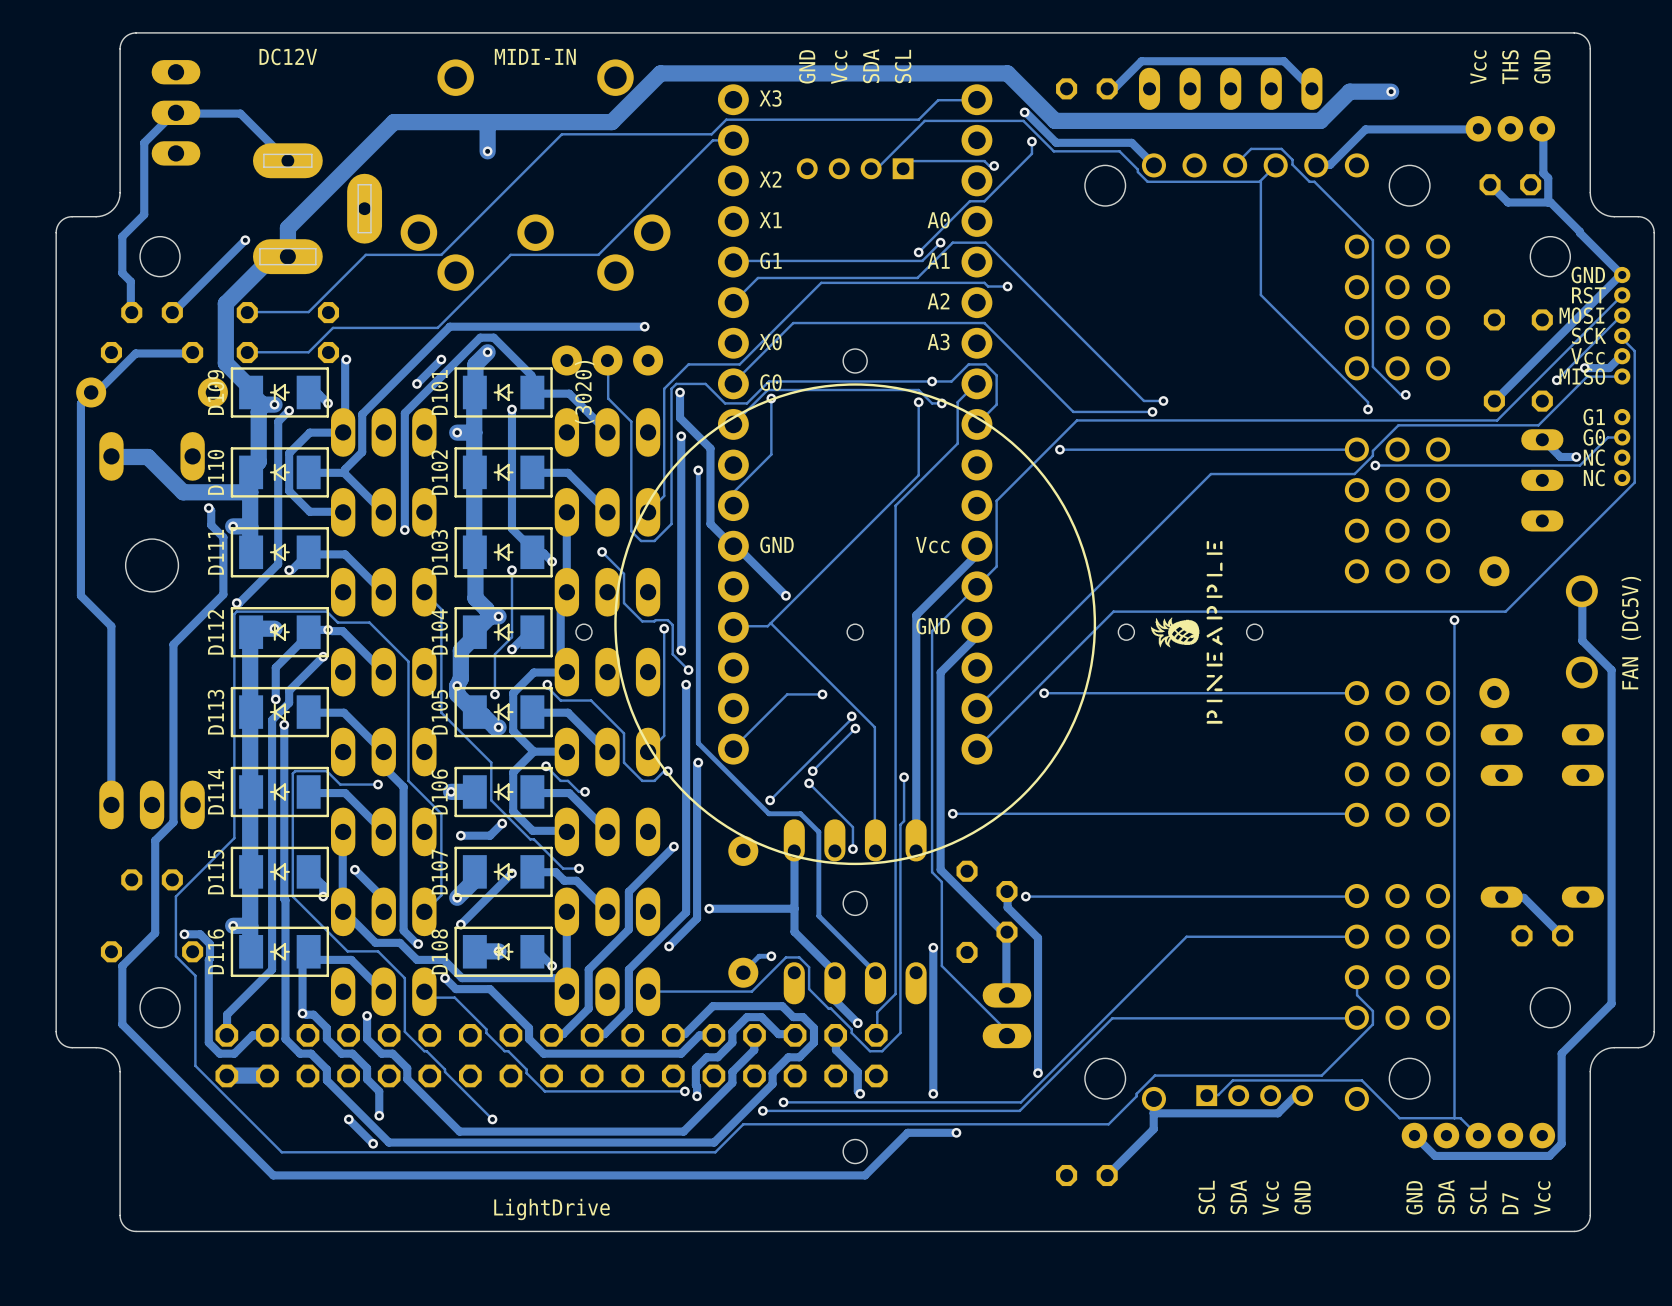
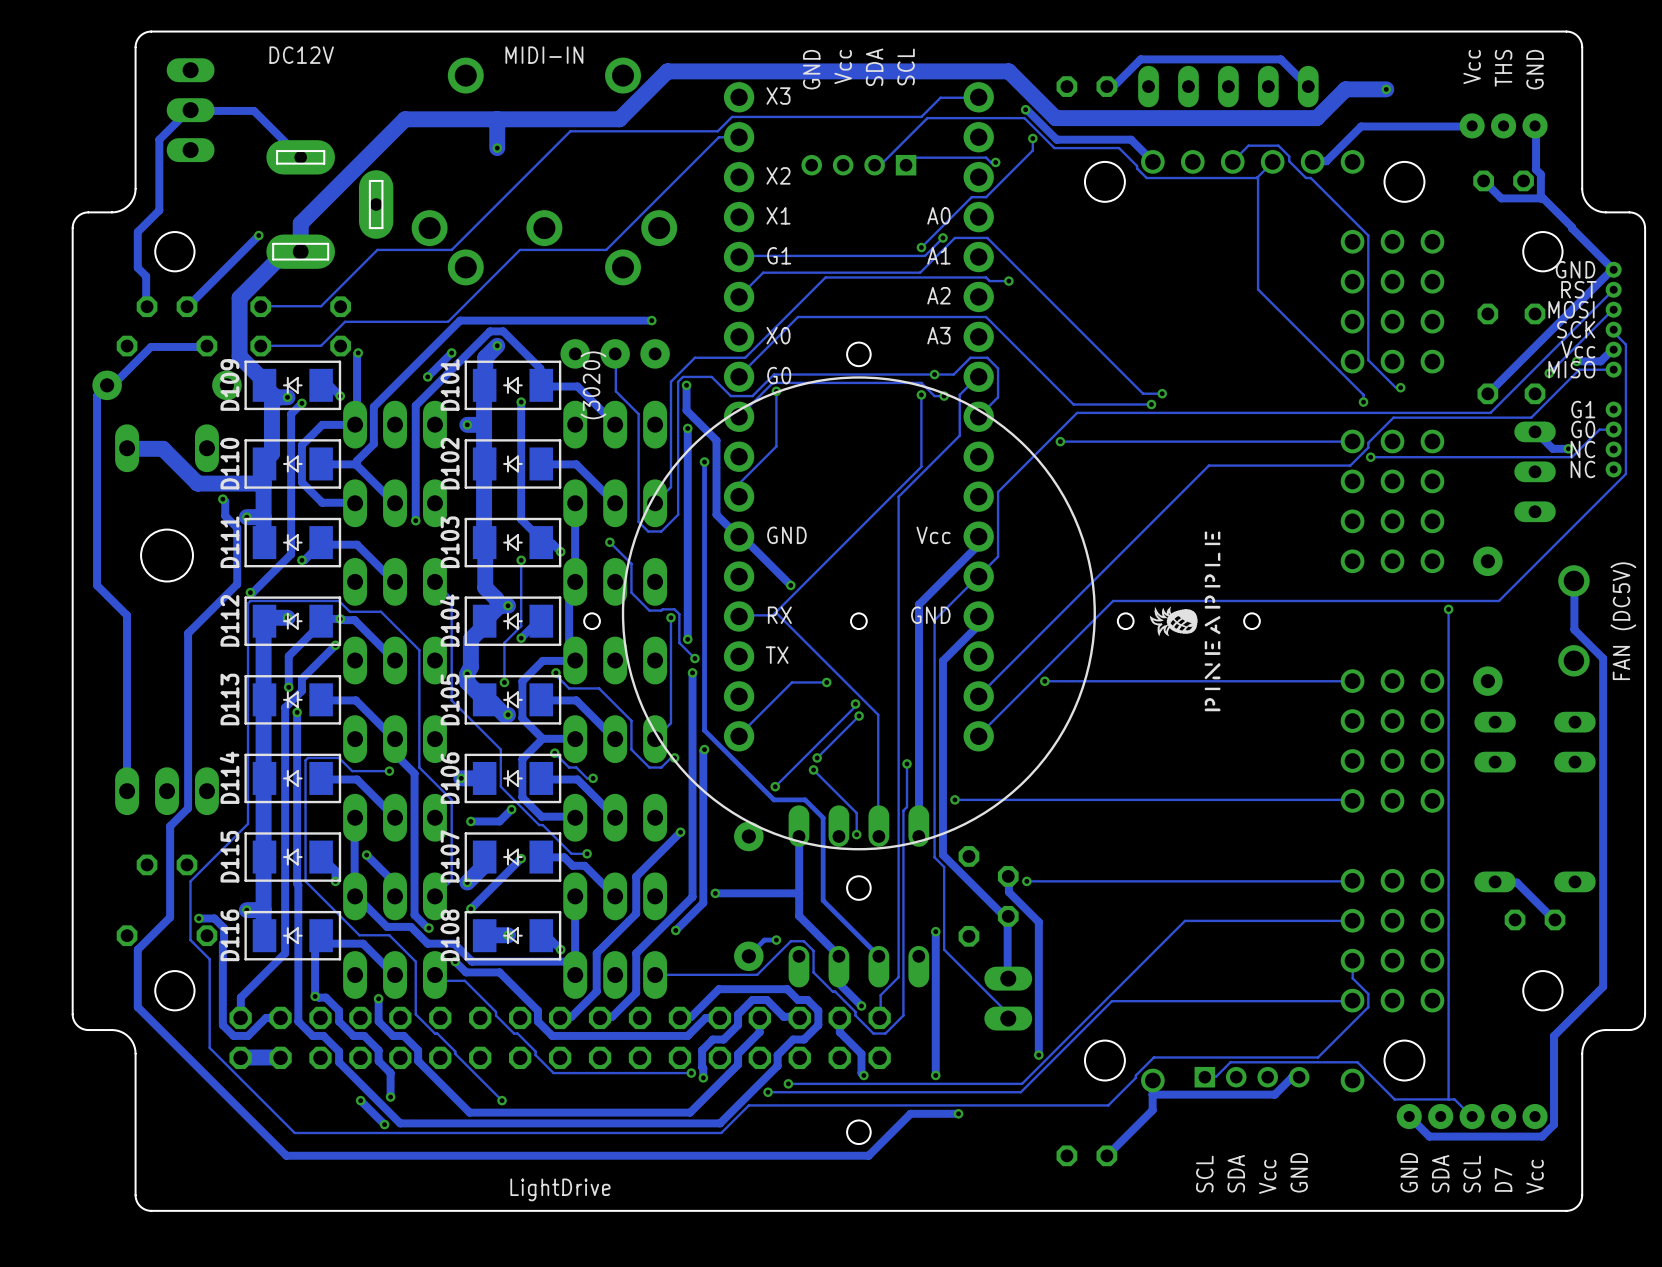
text: none -> RX (779, 615)
text: none -> TX (777, 655)

